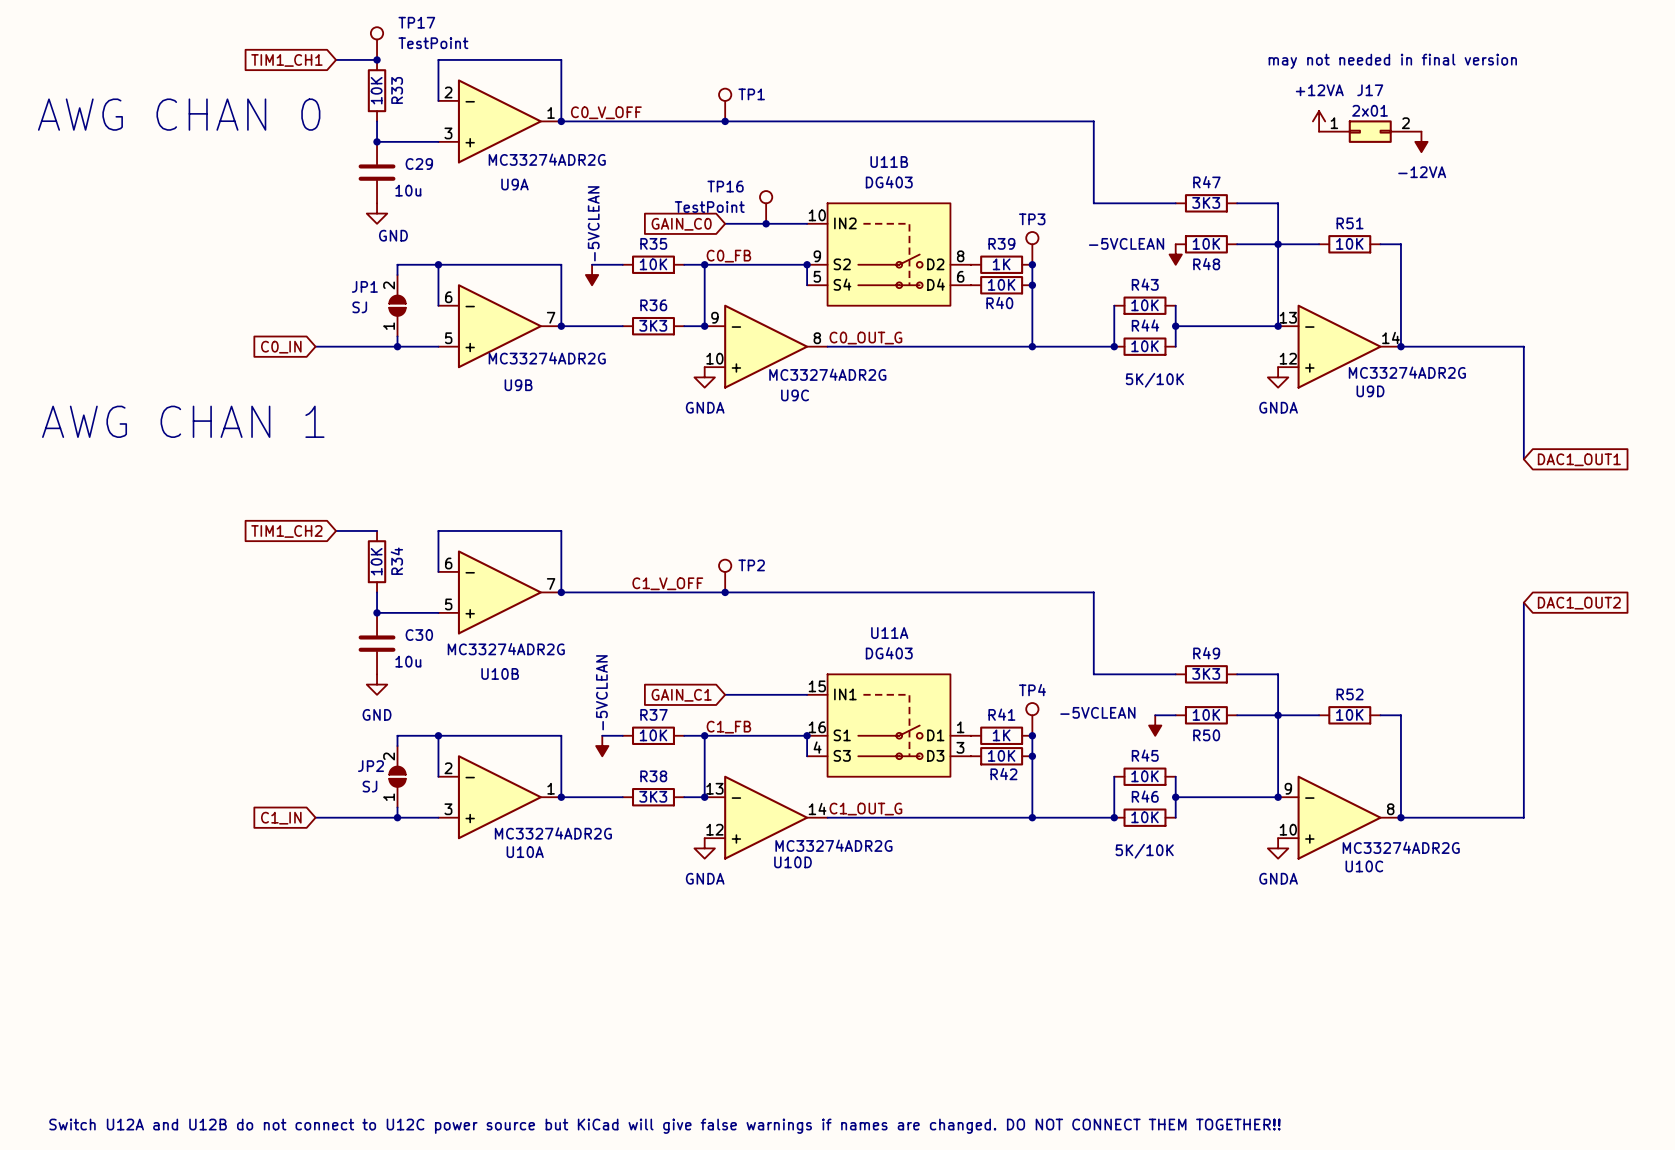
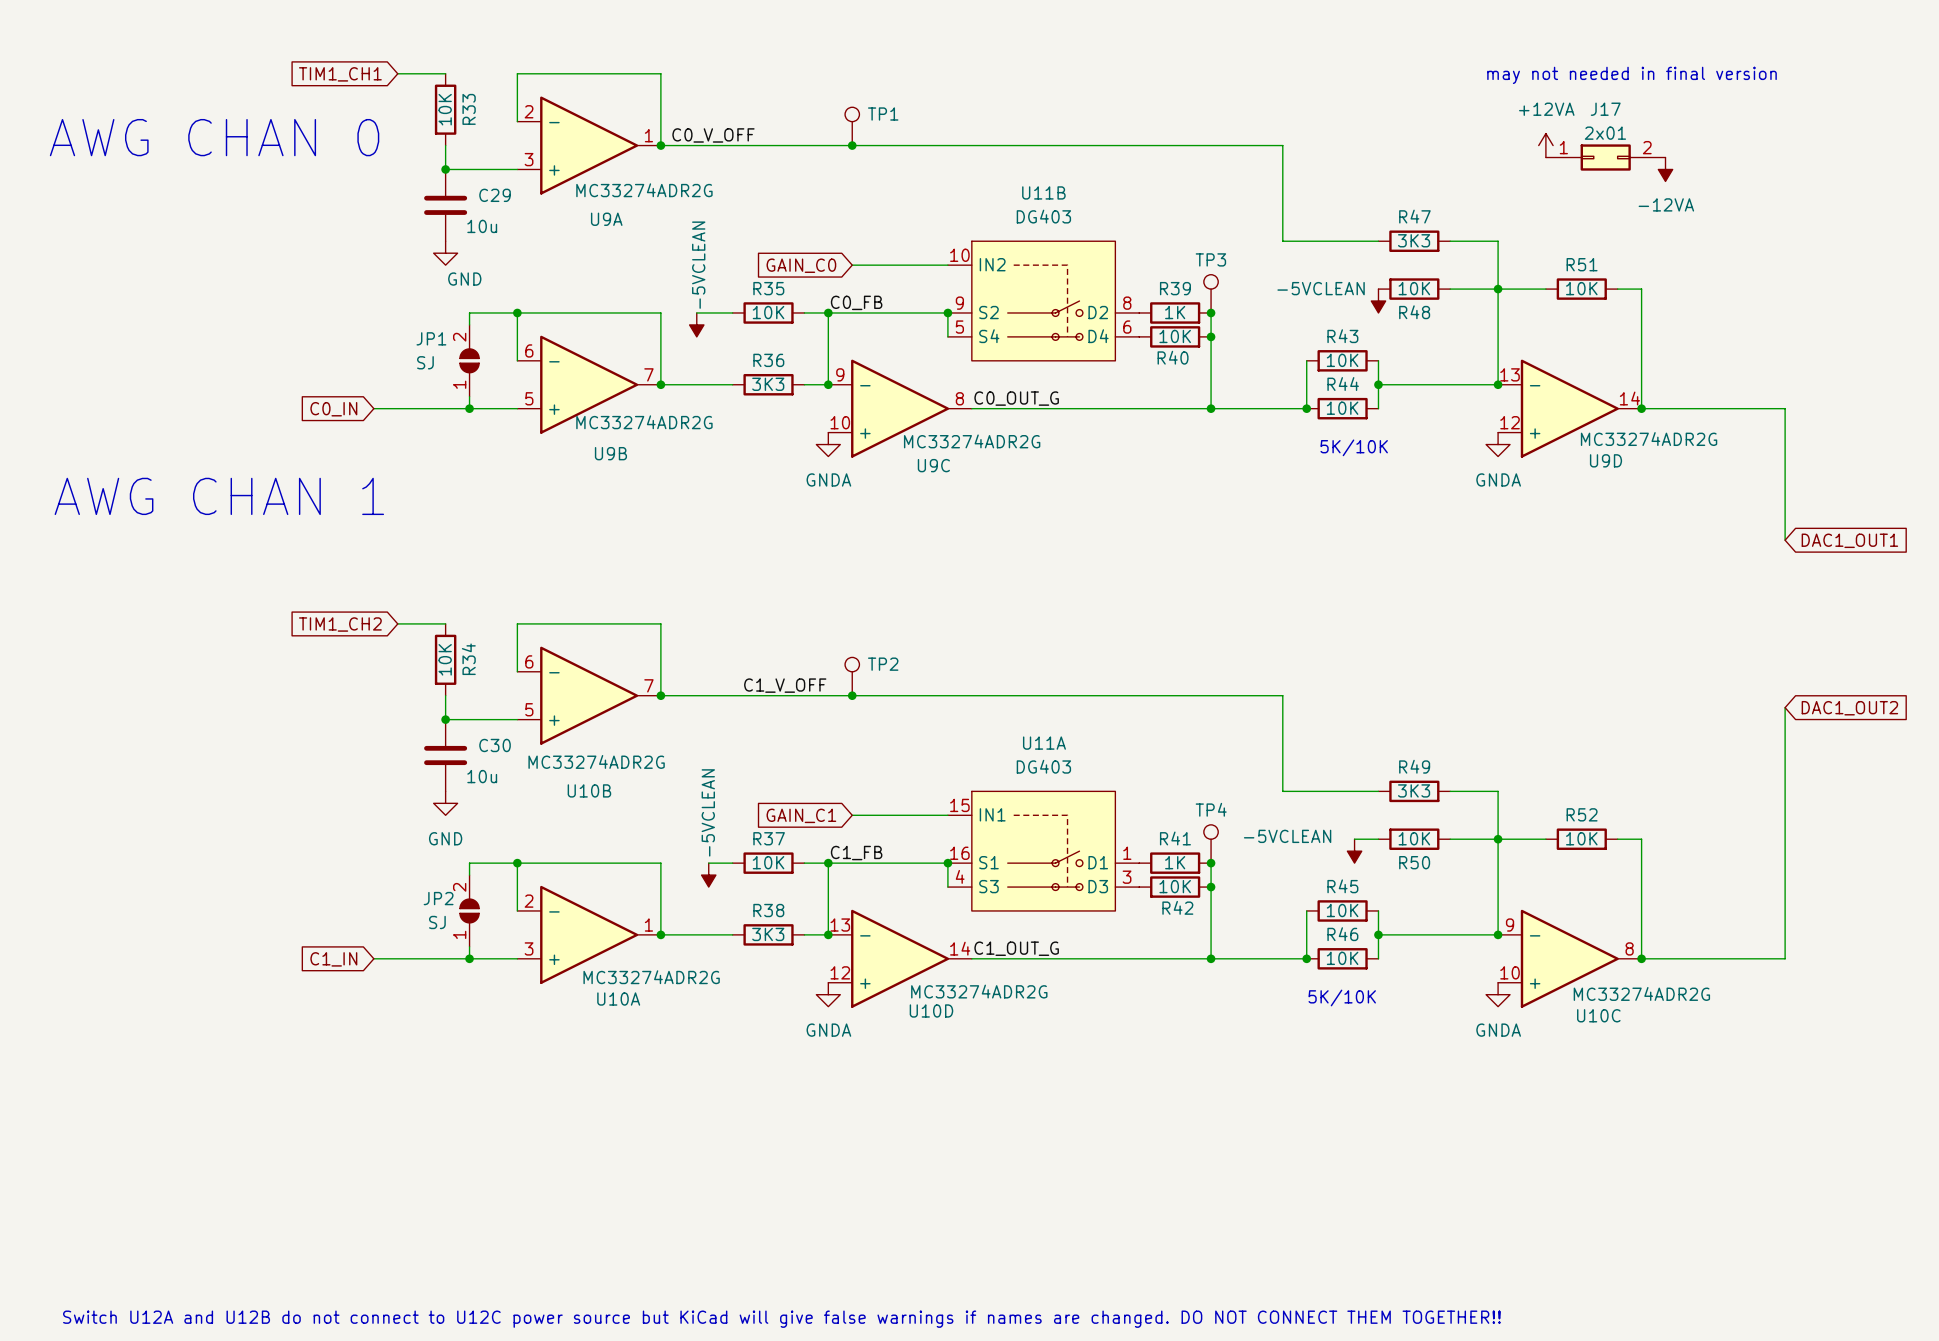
TP17: TestPoint (377, 43) -> none
junction: (377, 59) -> none
TP16: TestPoint (766, 207) -> none
junction: (766, 223) -> none

